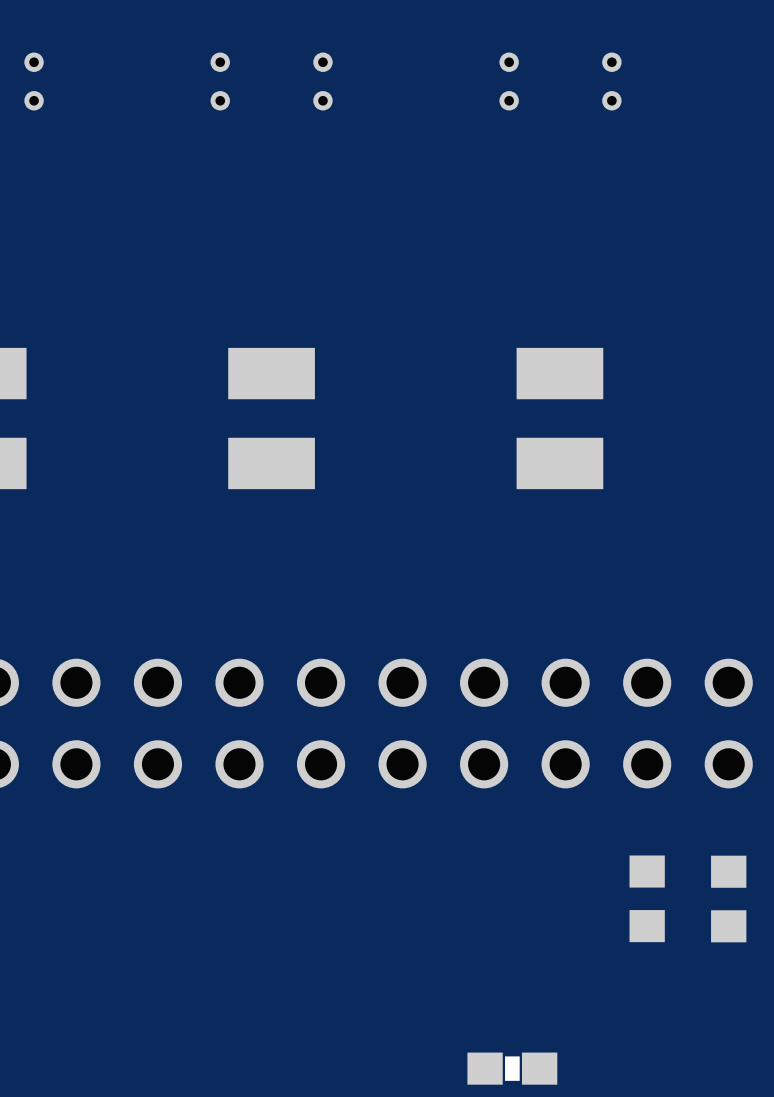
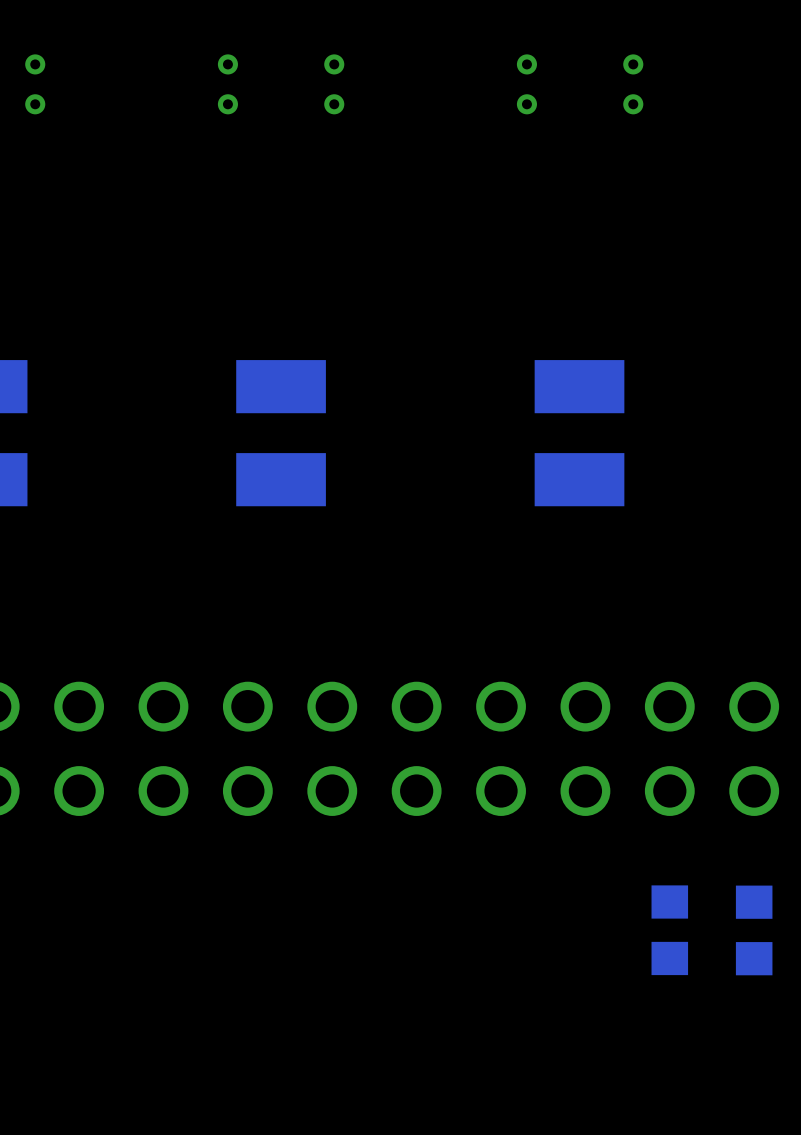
part: (512, 1068) -> none

